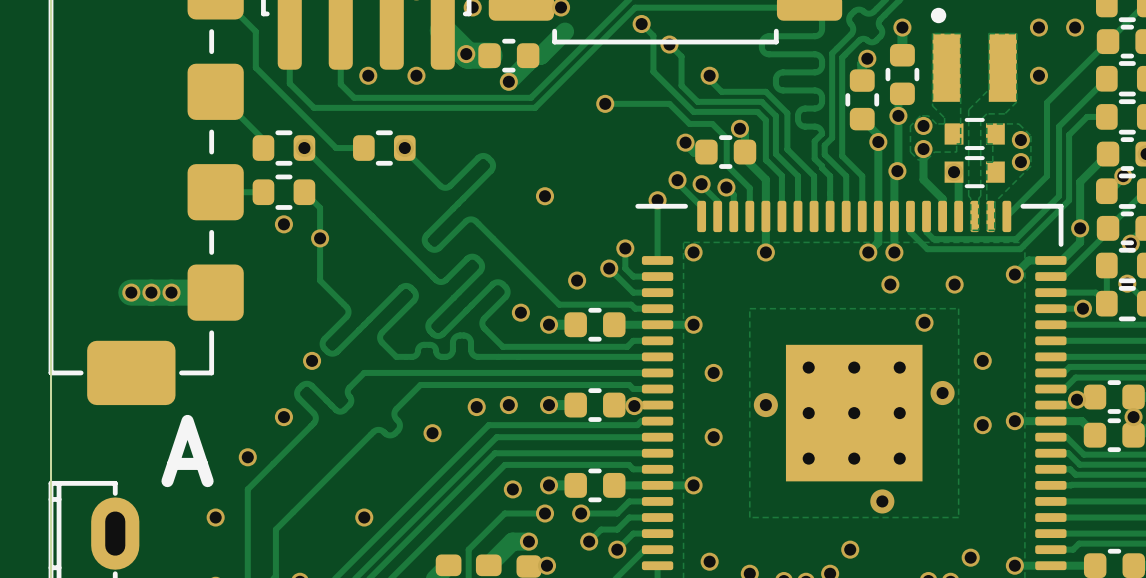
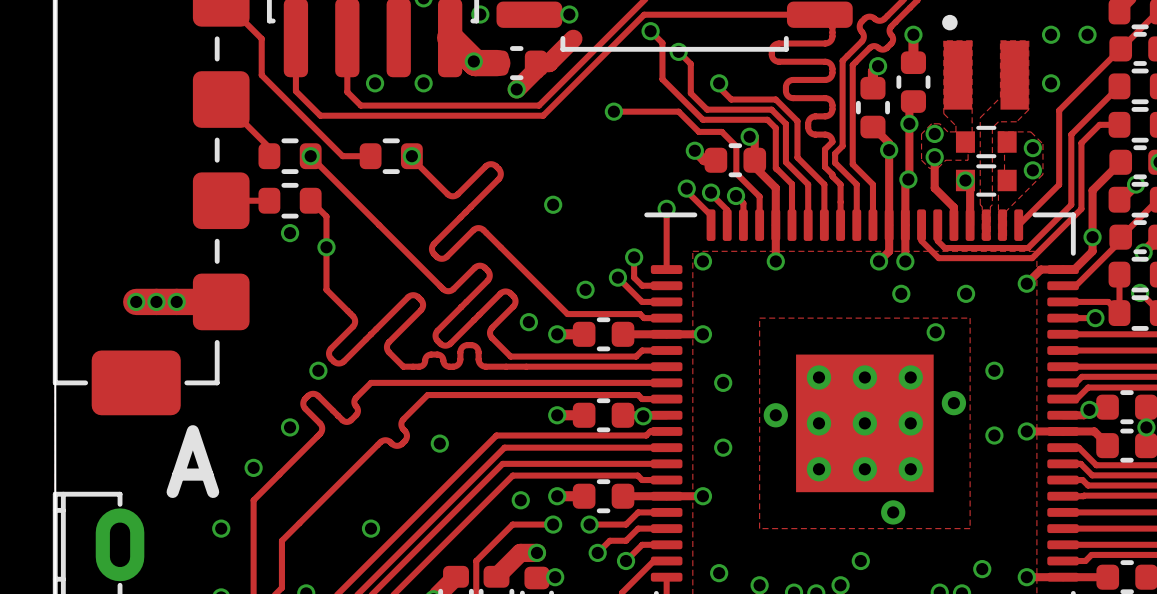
via: (508, 405) -> none
via: (476, 407) -> none

